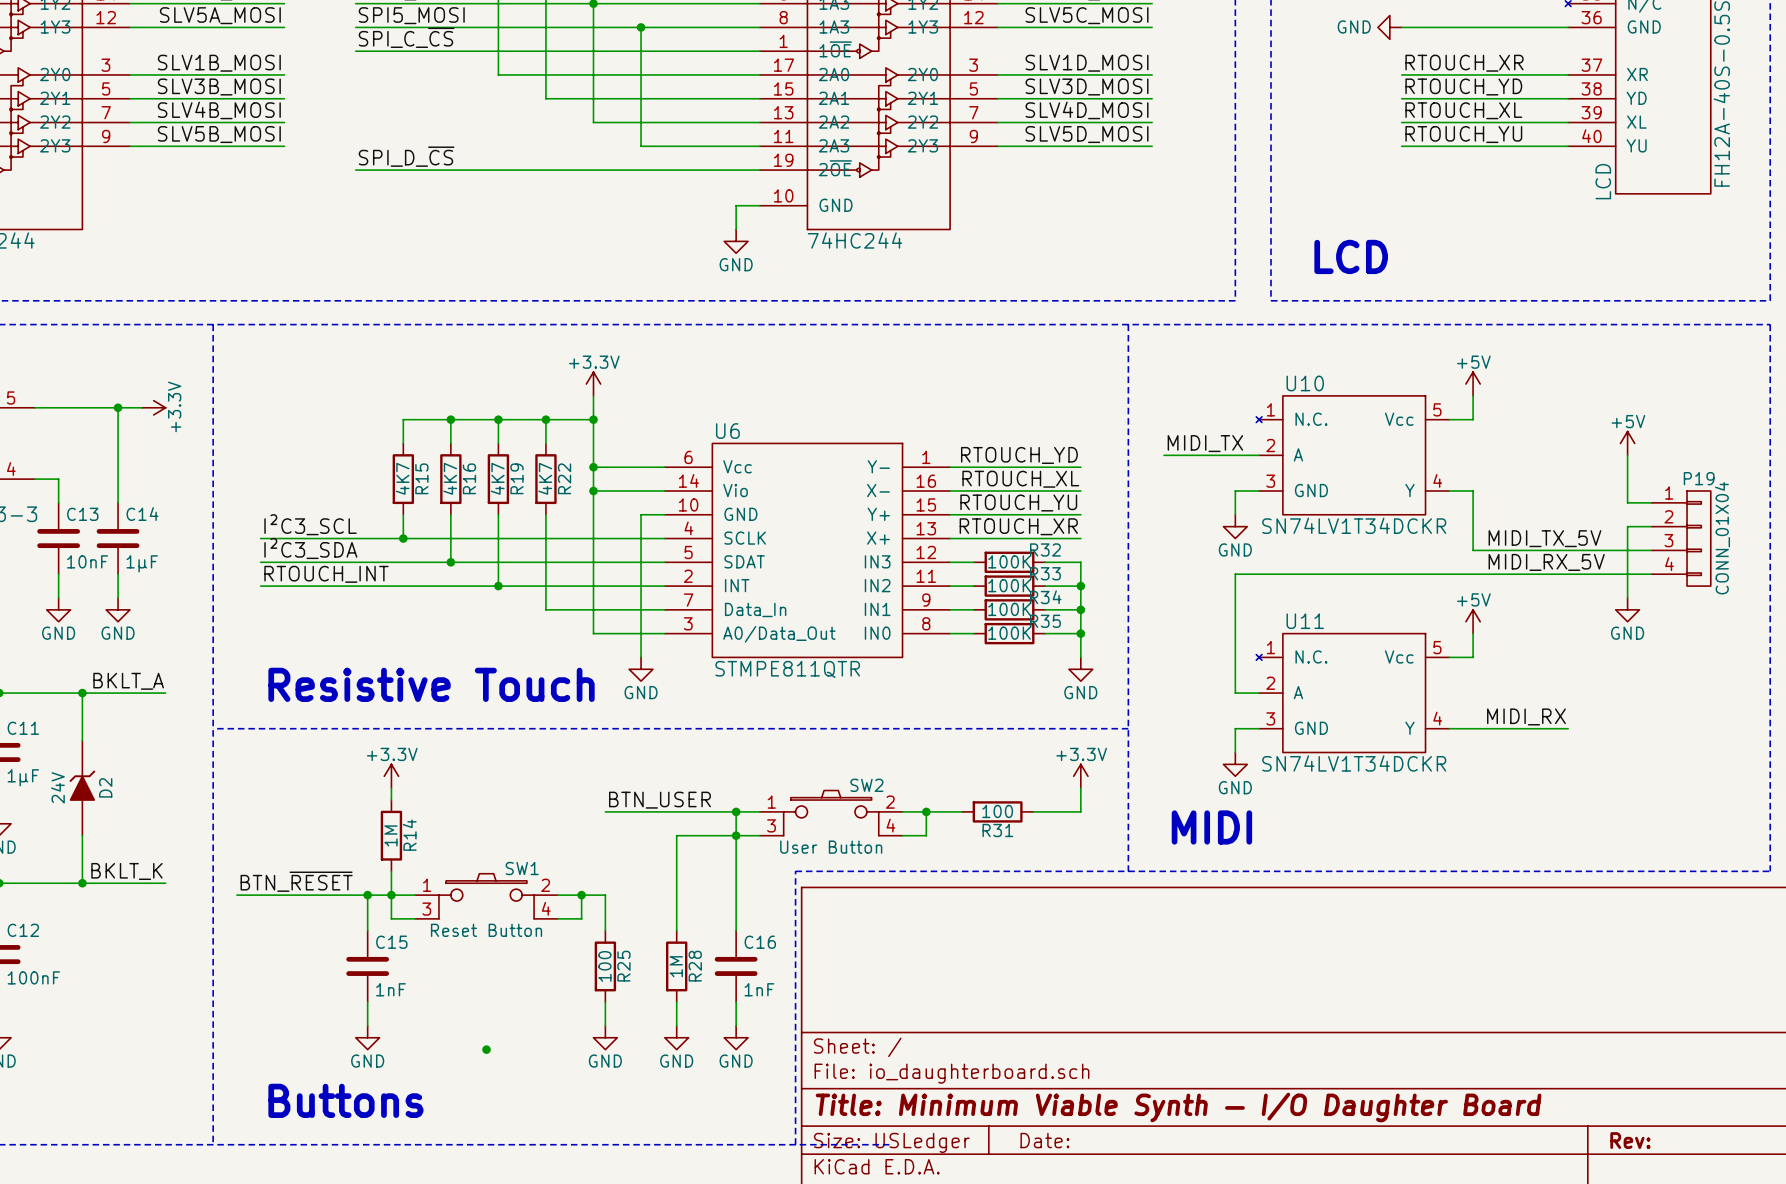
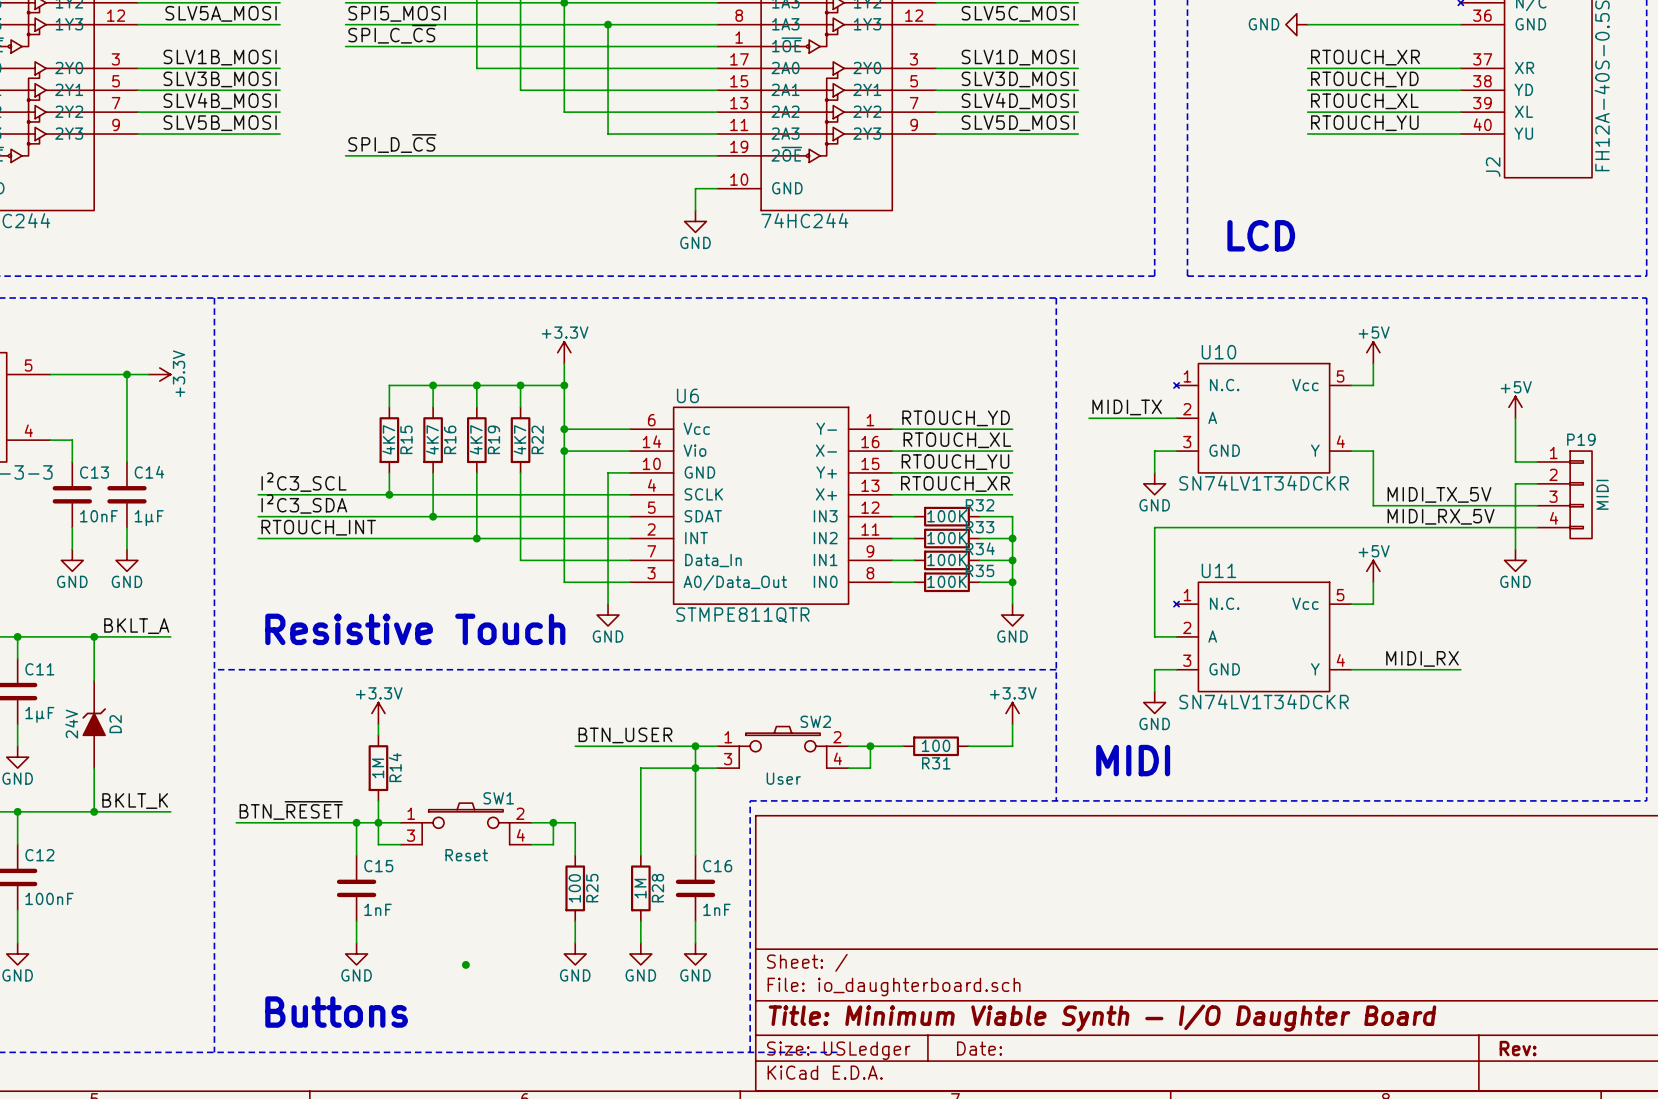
LCD name: LCD (1603, 181) -> J2 (1493, 167)
P19 value: CONN_01X04 (1722, 538) -> MIDI (1602, 494)
SW2 value: User Button (831, 847) -> User (783, 778)
SW1 value: Reset Button (486, 930) -> Reset (466, 855)

